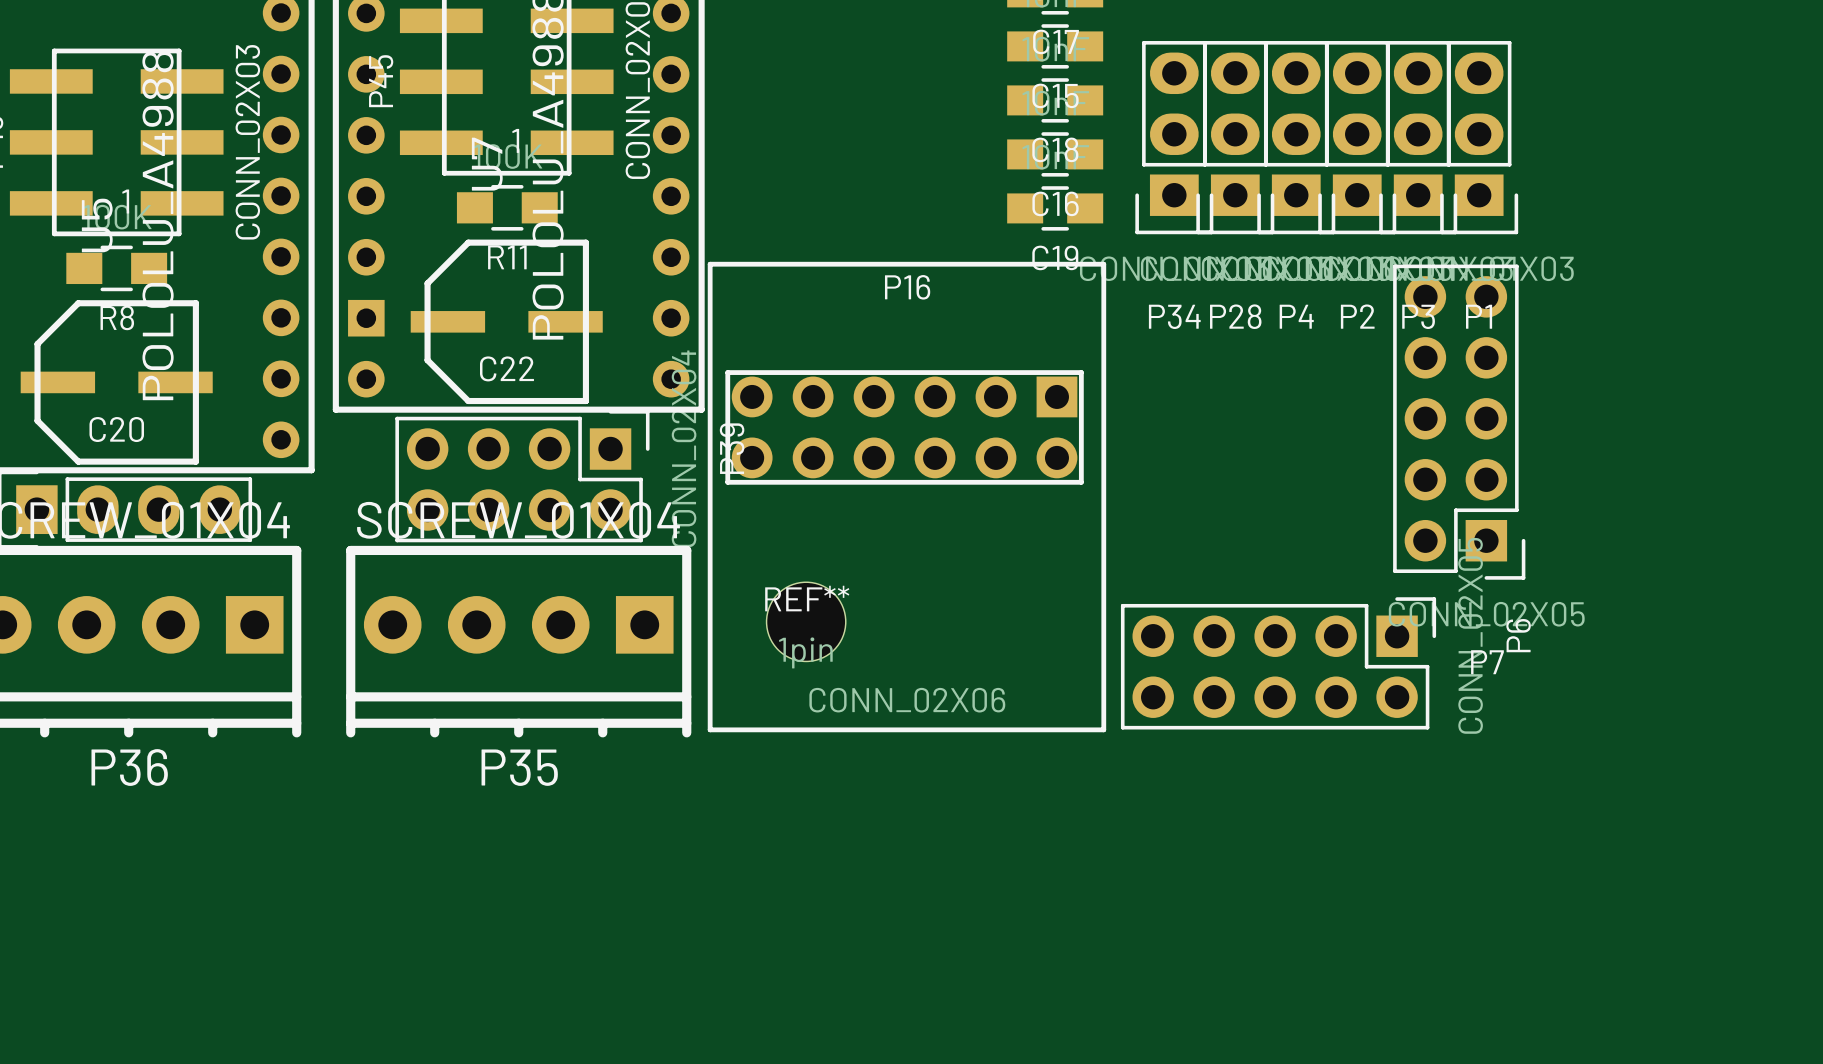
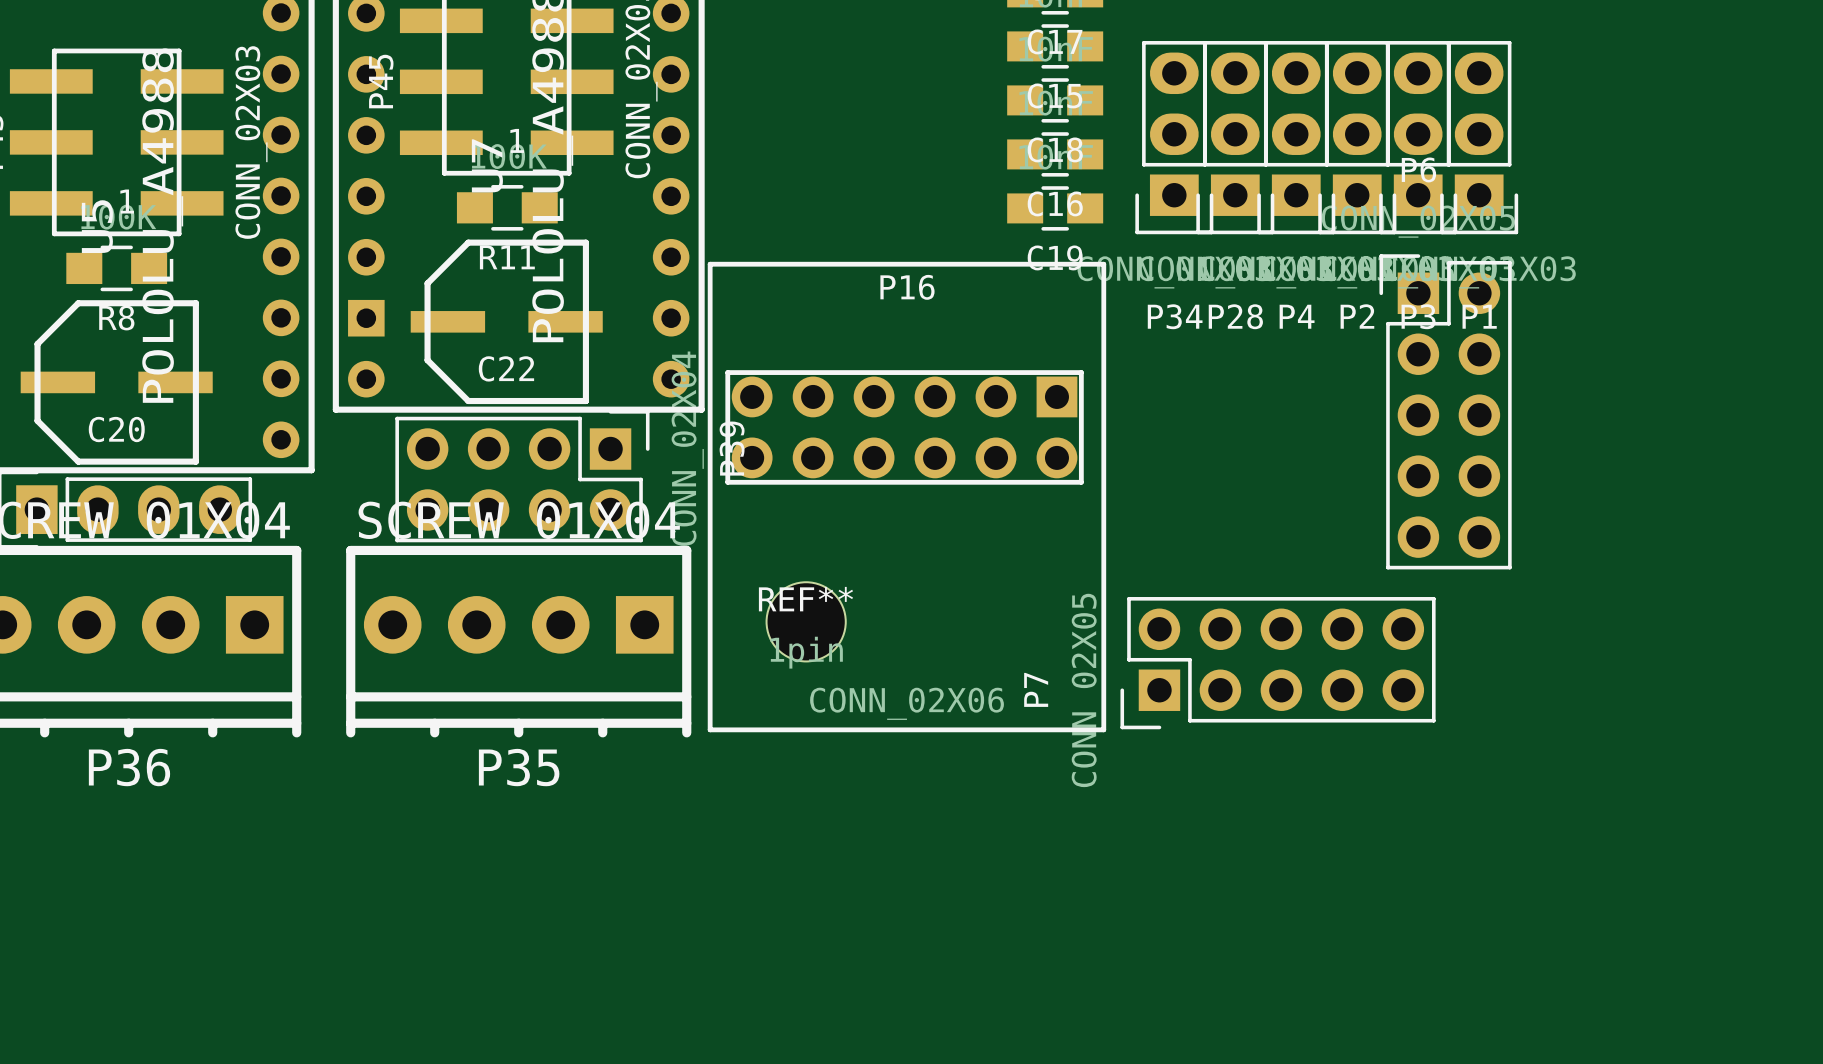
P7 rotation: 0° (1459, 422) -> 90° clockwise (1278, 663)
P7 position: (1459, 422) -> (1278, 663)
P6 rotation: 0° (1278, 663) -> 90° counterclockwise (1445, 411)
P6 position: (1278, 663) -> (1445, 411)

